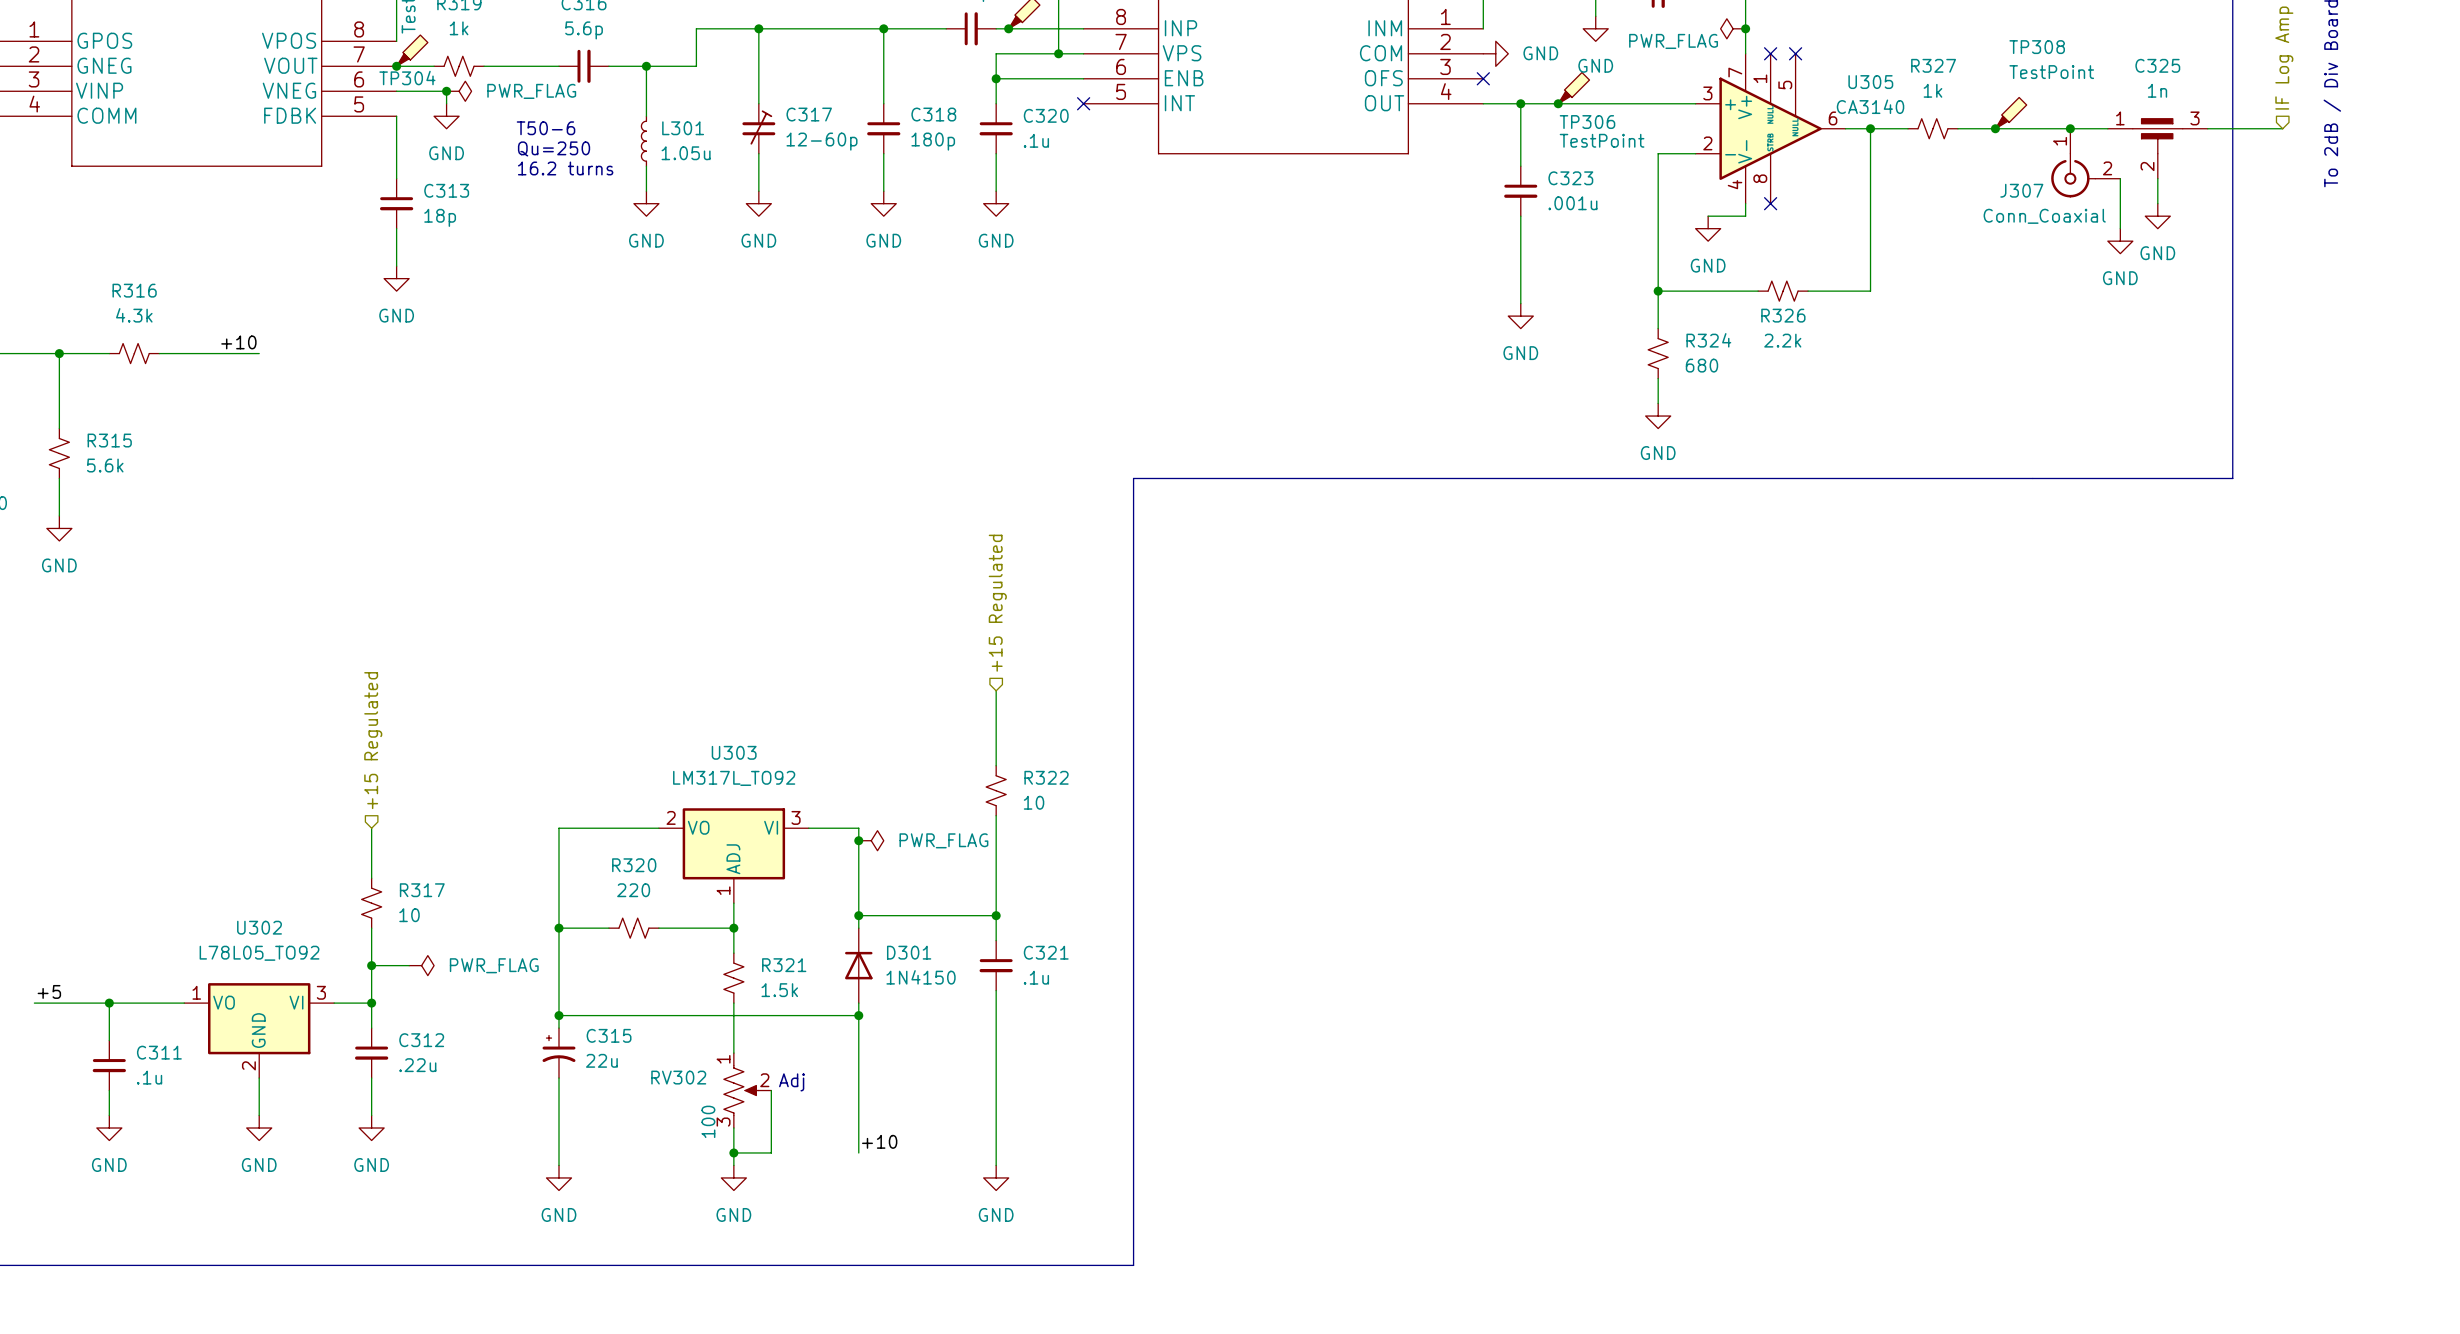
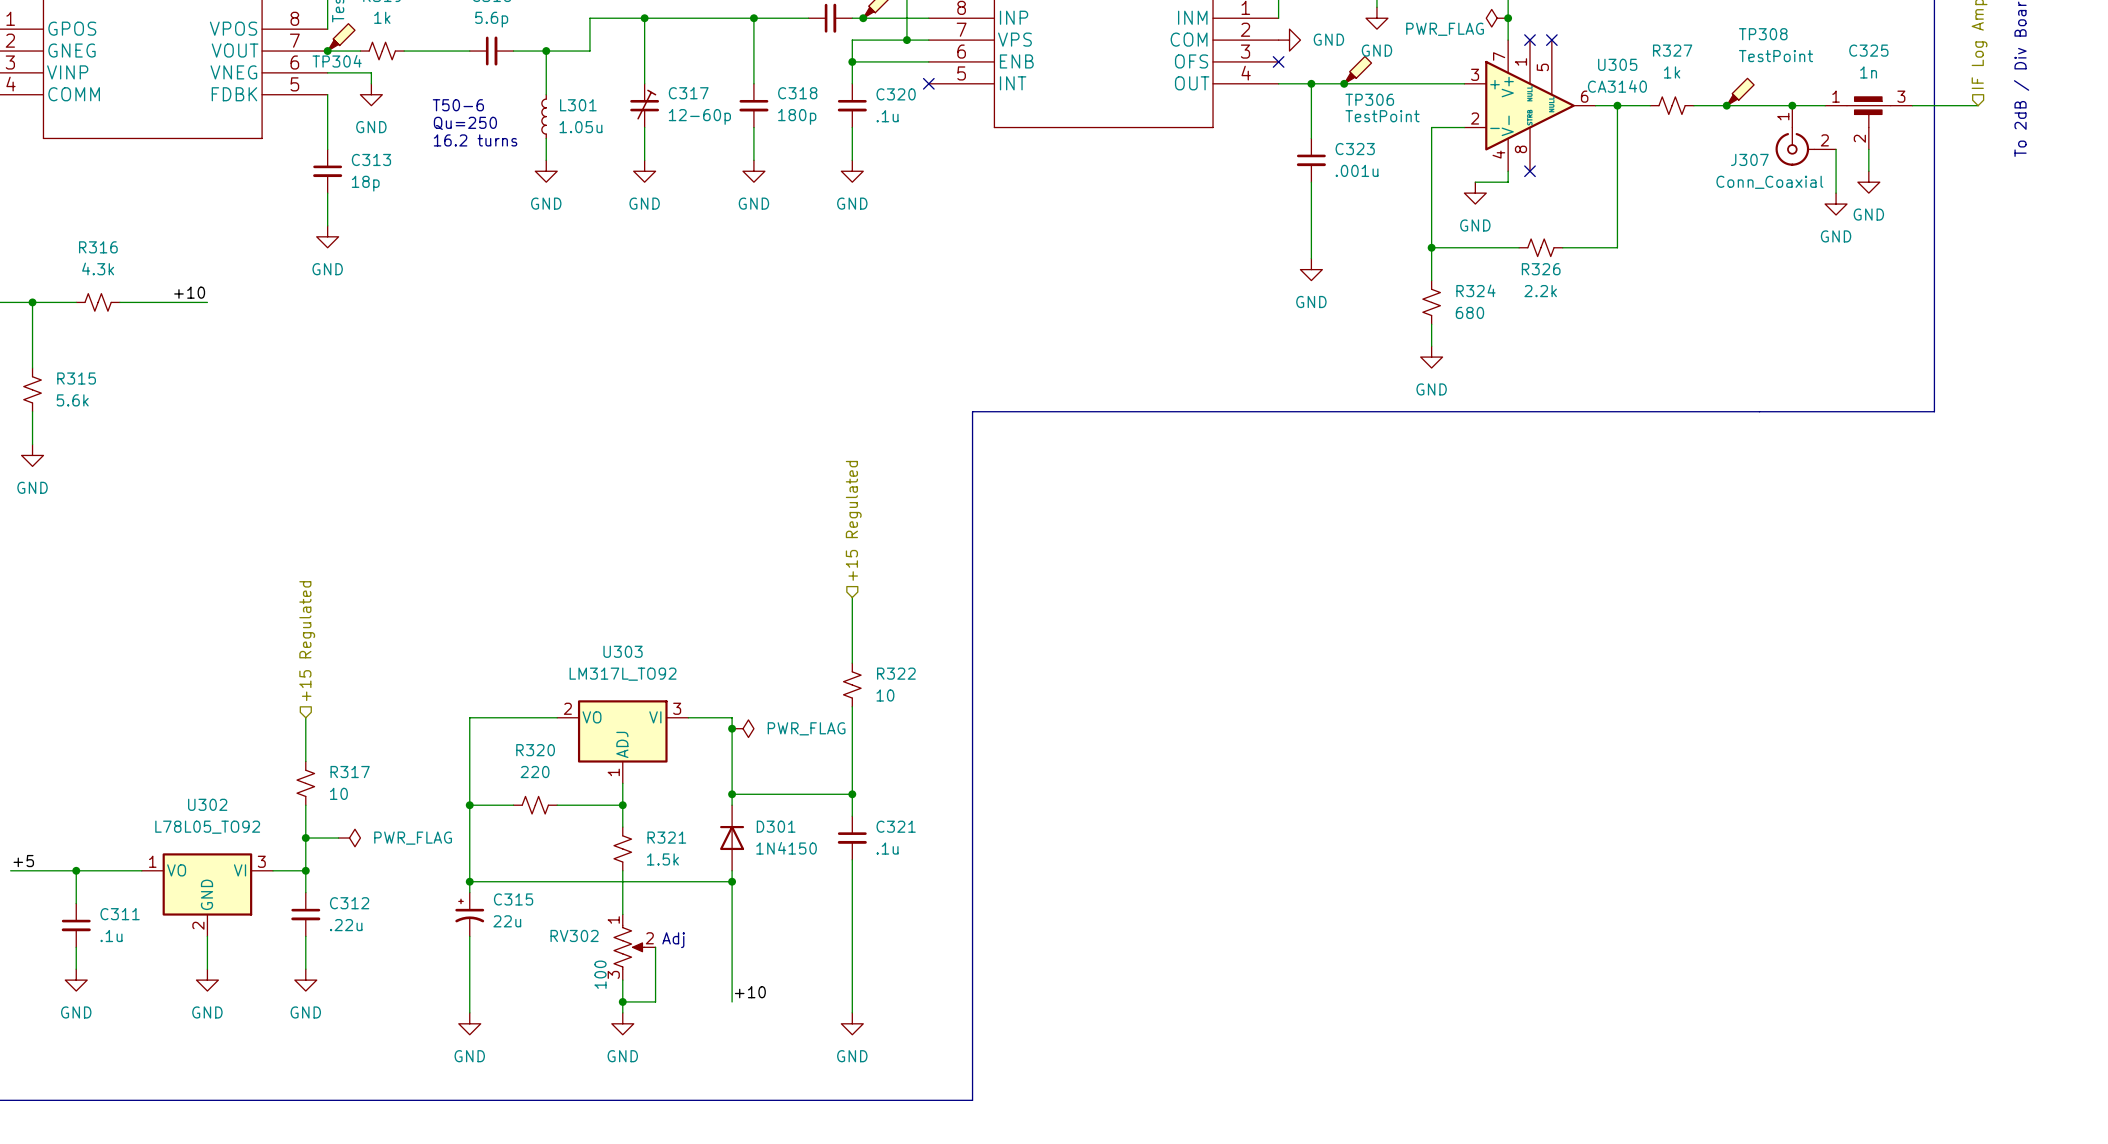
junction: (446, 91) -> none
power symbol: PWR_FLAG (459, 91) -> none

